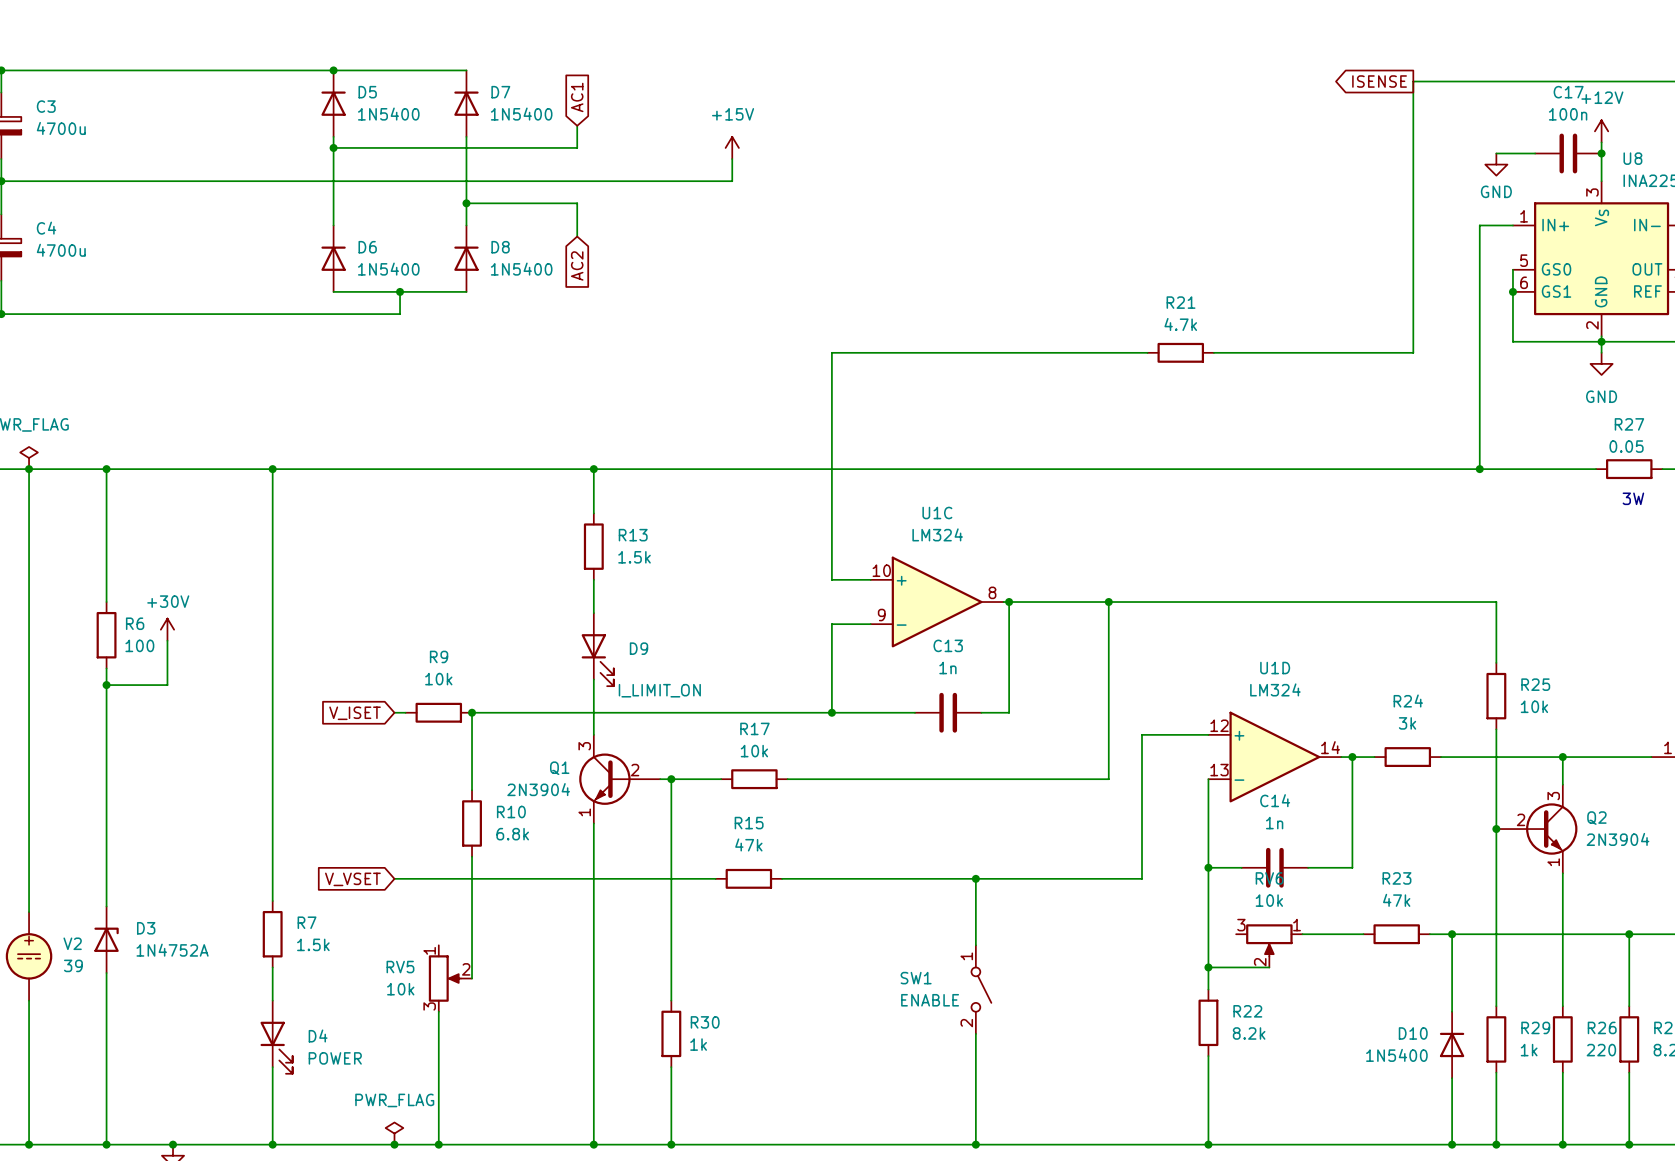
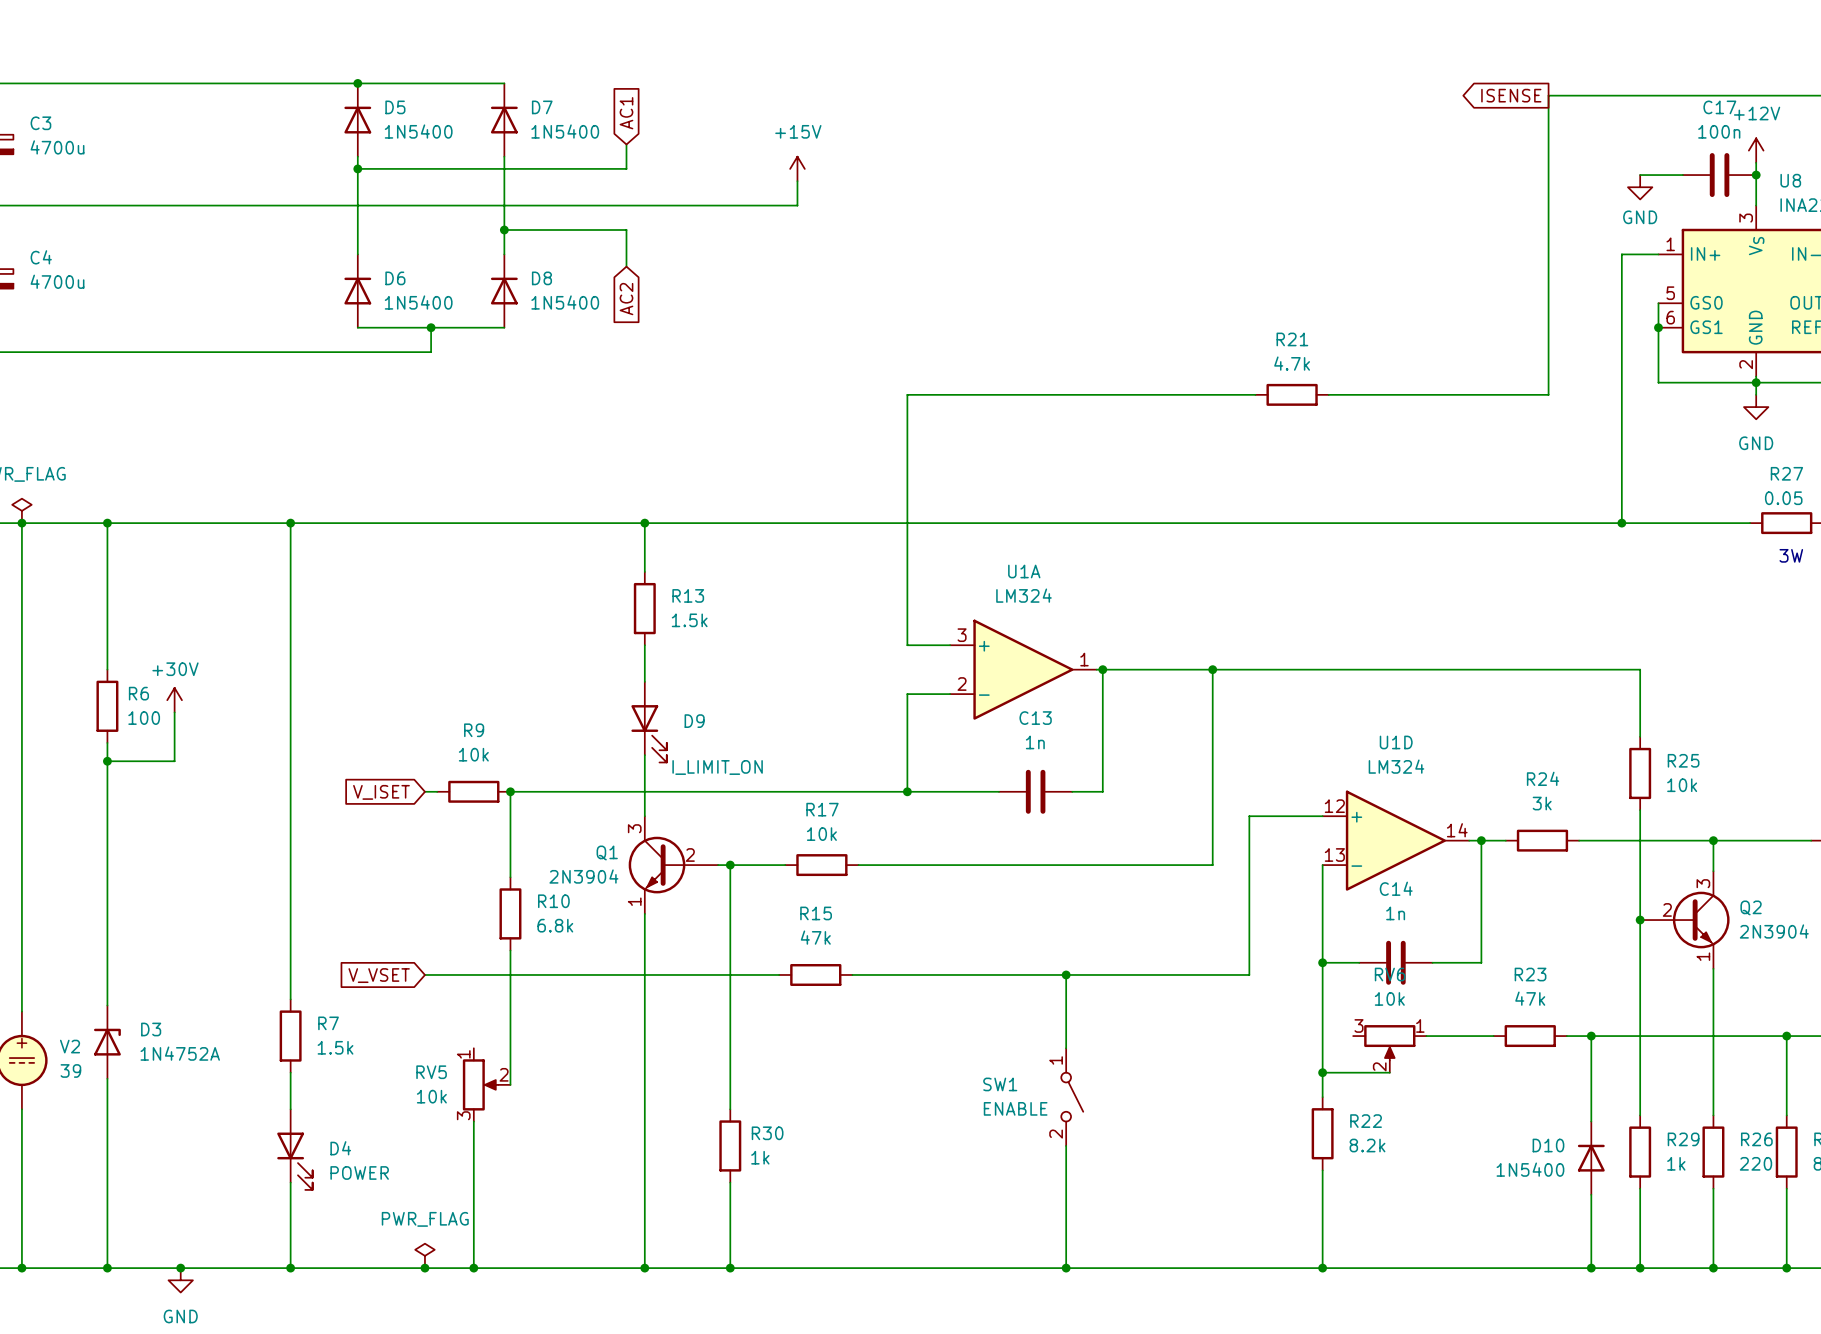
U1C name: U1C (937, 513) -> U1A (1024, 571)
U1C pin number: 10 (881, 570) -> 3 (962, 635)
U1C pin number: 8 (992, 592) -> 1 (1084, 659)
U1C pin number: 9 (881, 615) -> 2 (962, 684)

